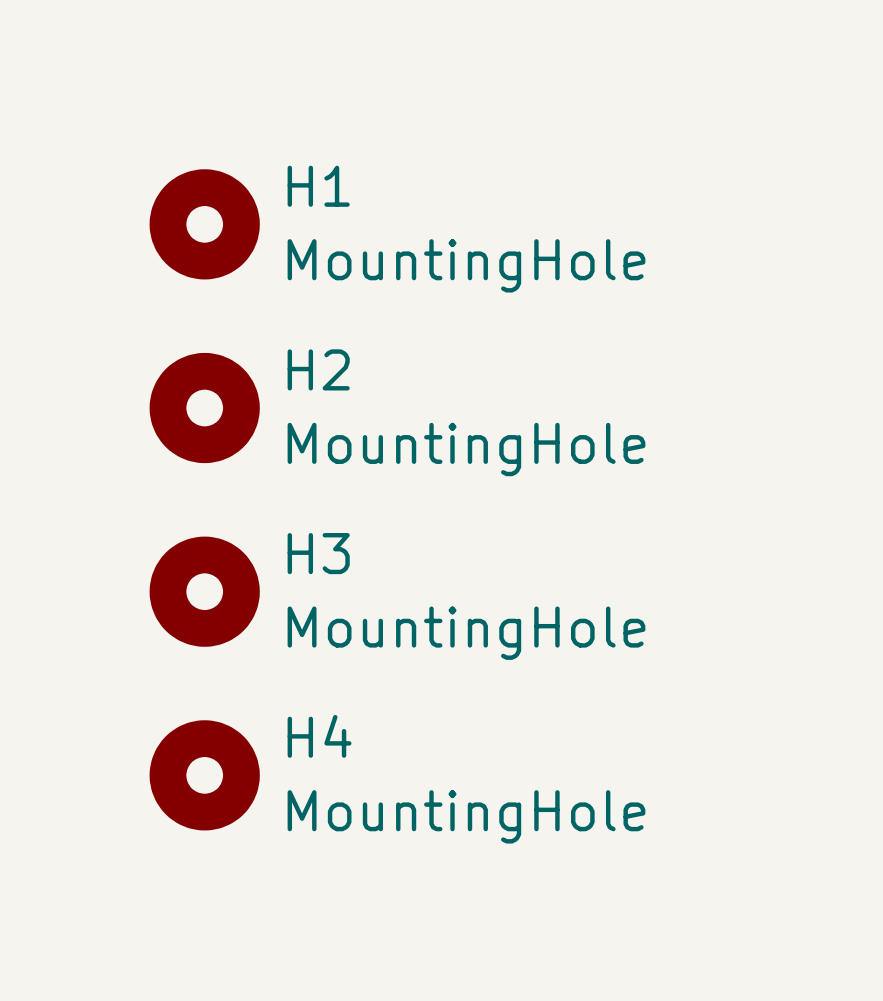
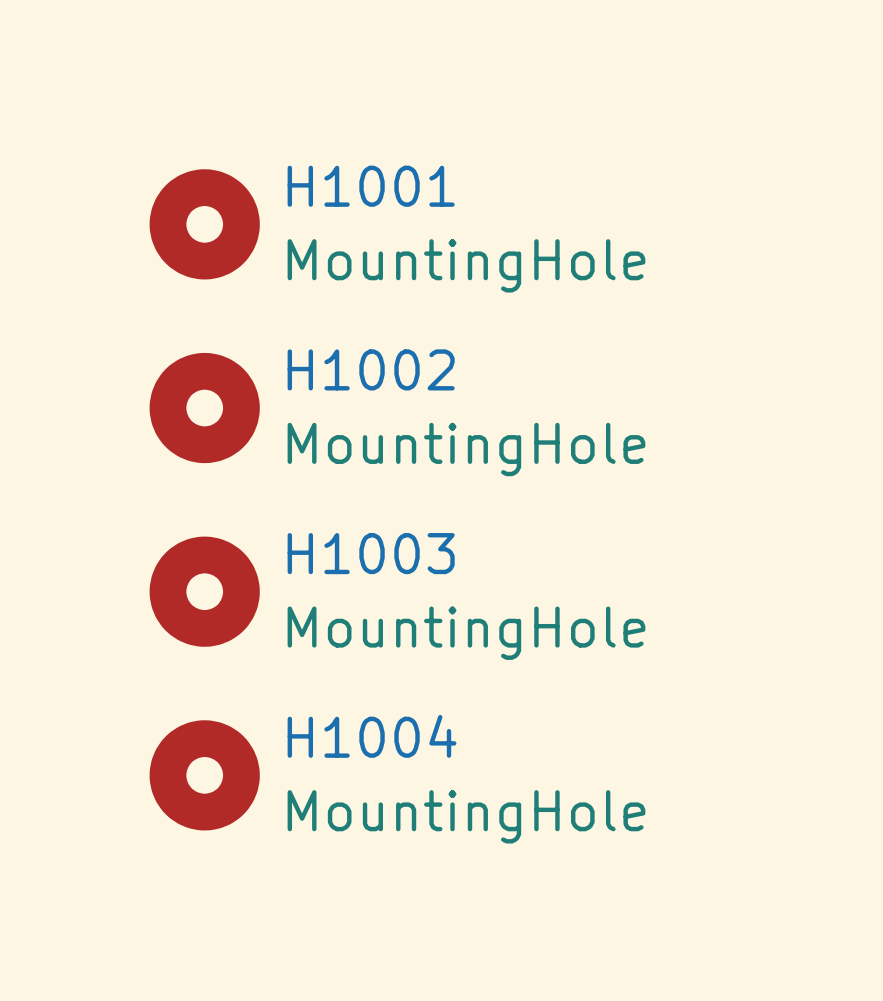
H1 name: H1 (318, 186) -> H1001 (371, 186)
H2 name: H2 (318, 369) -> H1002 (371, 369)
H3 name: H3 (318, 553) -> H1003 (371, 553)
H4 name: H4 (319, 736) -> H1004 (372, 736)

